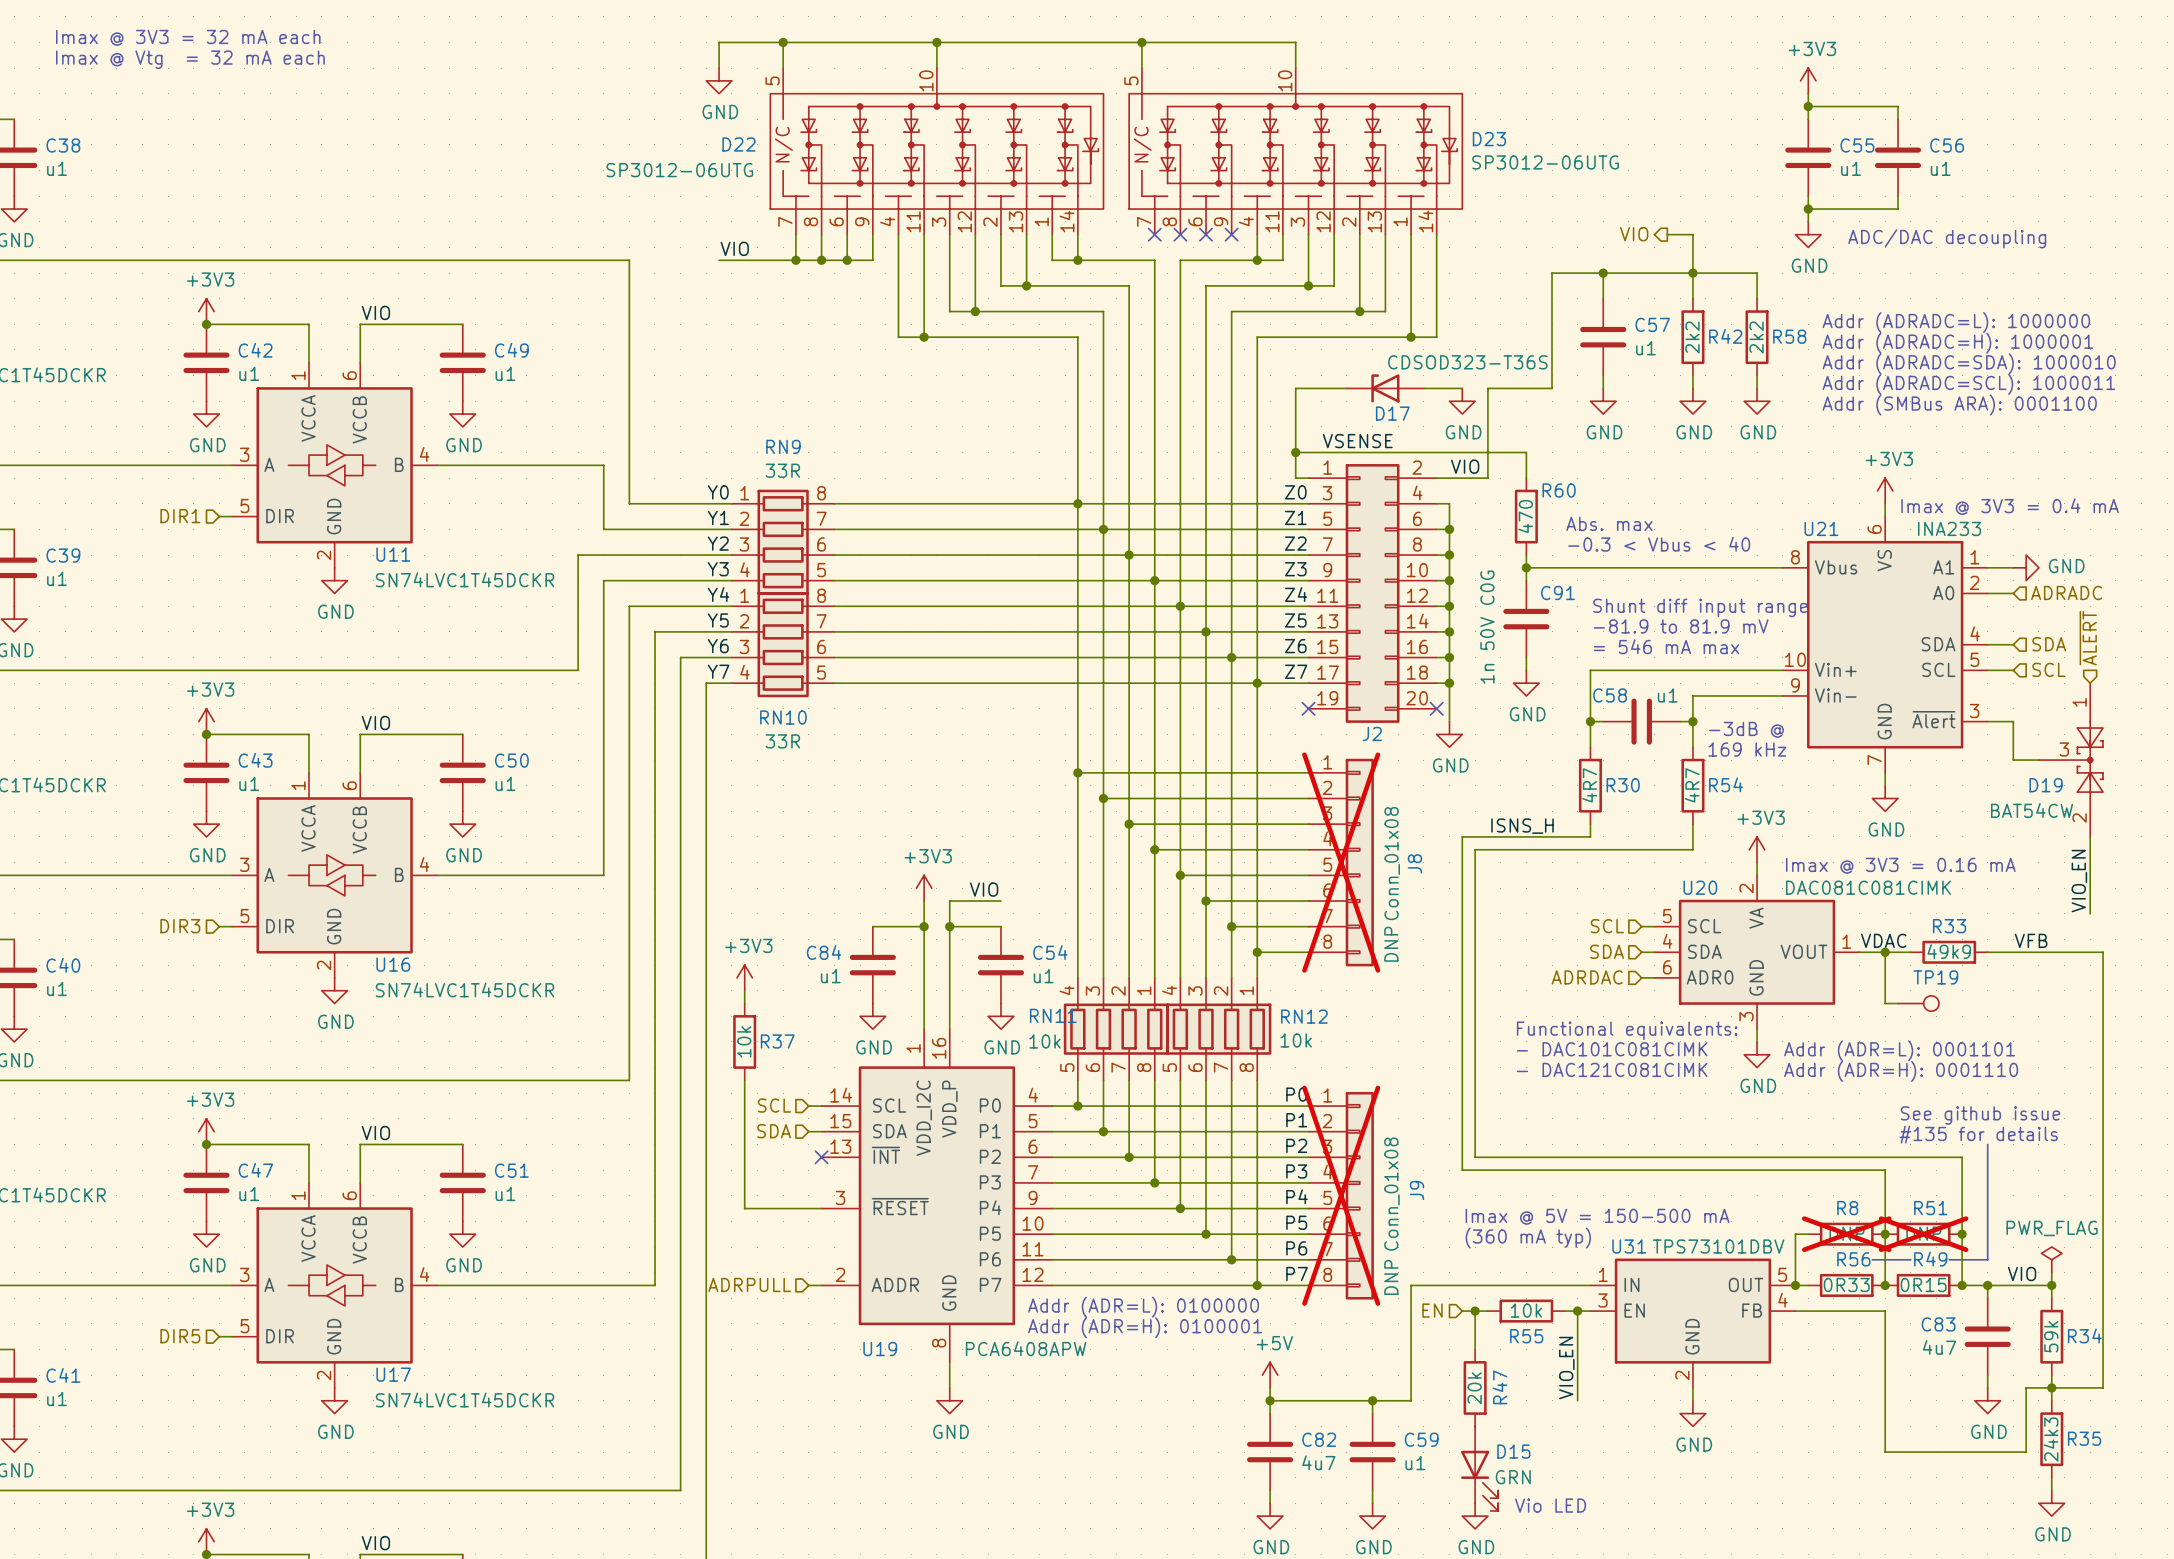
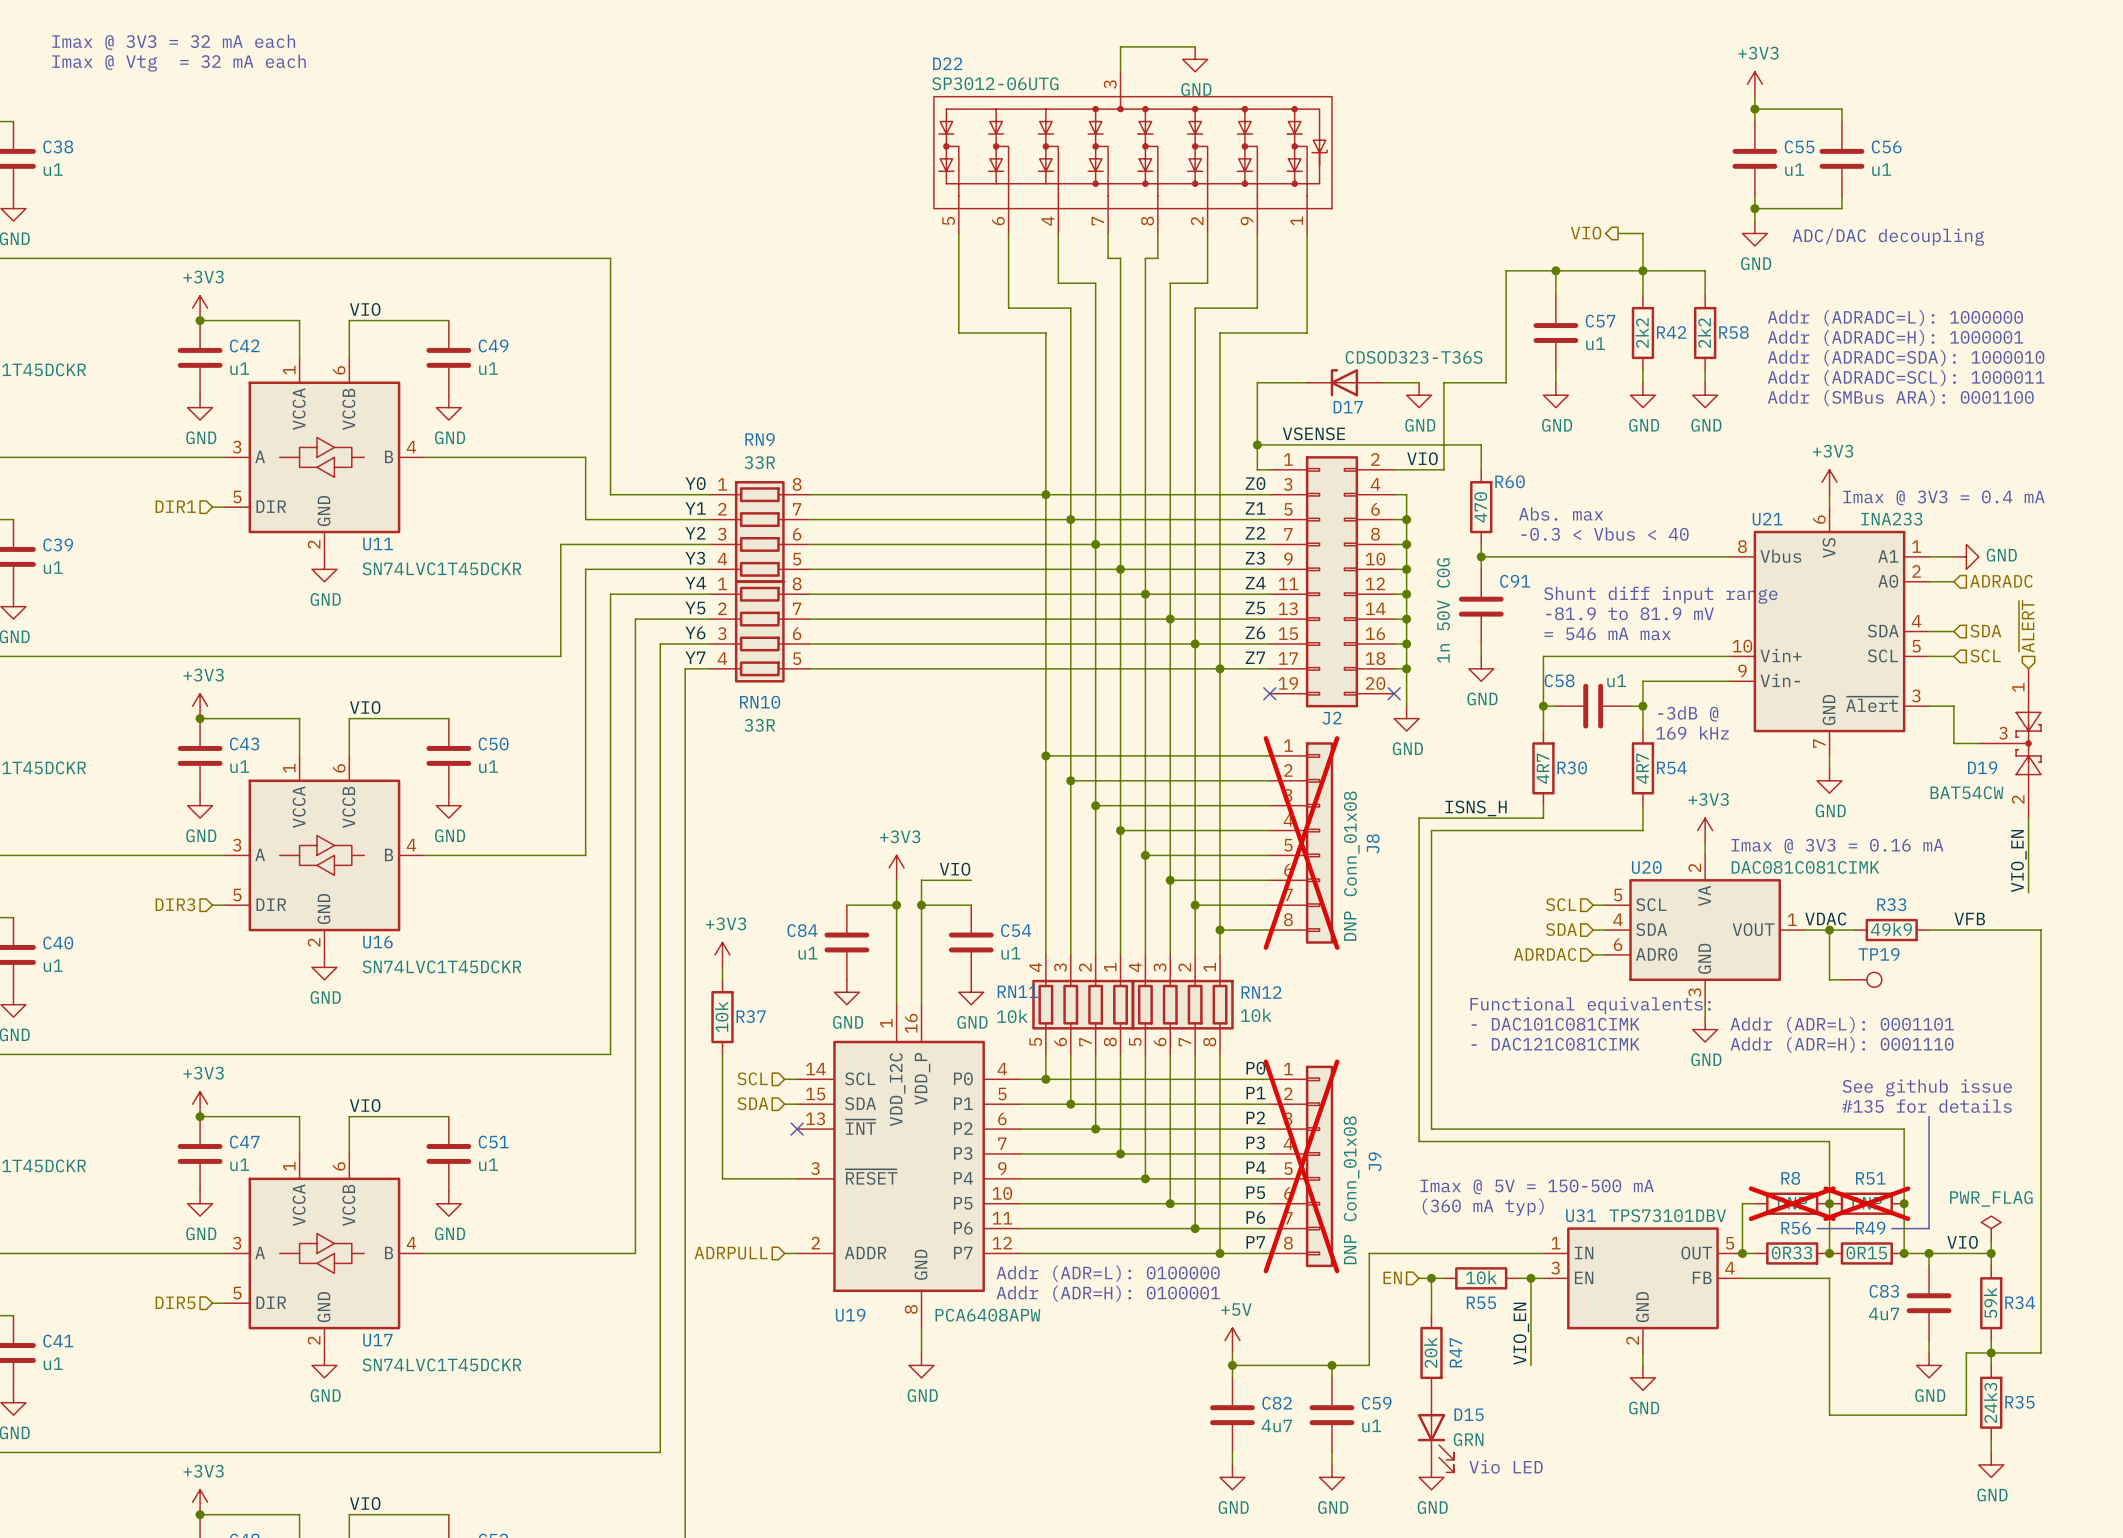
wire: (783, 42) (783, 68) -> none
junction: (783, 42) -> none
wire: (936, 42) (936, 68) -> none
junction: (936, 42) -> none
wire: (1141, 42) (1141, 68) -> none
junction: (1141, 42) -> none
wire: (1154, 42) (719, 42) (719, 68) -> (1120, 46) (1120, 71)
wire: (1231, 42) (1295, 42) (1295, 68) -> none
power symbol: none -> GND (1195, 59)
D22 symbol: [770, 68, 1104, 235] -> [933, 71, 1332, 234]
power symbol: GND (719, 80) -> none
D22 name position: D22 (738, 144) -> D22 (947, 63)
D23: SP3012-06UTG (1295, 151) -> none
D22 value position: SP3012-06UTG (679, 170) -> SP3012-06UTG (995, 83)
wire: (795, 234) (795, 260) -> none
wire: (821, 234) (821, 260) -> none
wire: (847, 234) (847, 260) -> none
wire: (872, 234) (872, 260) (719, 260) -> none
wire: (898, 234) (898, 337) (988, 337) -> (958, 233) (958, 333)
wire: (924, 234) (924, 337) -> none
wire: (949, 234) (949, 311) (1039, 311) -> (1008, 233) (1008, 308)
wire: (975, 234) (975, 311) -> none
wire: (1000, 234) (1000, 285) (1090, 285) -> (1058, 233) (1058, 283)
wire: (1026, 234) (1026, 285) -> none
wire: (1052, 234) (1052, 260) (1141, 260) -> (1108, 233) (1108, 258)
wire: (1077, 234) (1077, 260) -> none
no-connect mark: (1154, 234) -> none
no-connect mark: (1180, 234) -> none
no-connect mark: (1206, 234) -> none
no-connect mark: (1231, 234) -> none
wire: (1257, 234) (1257, 260) -> none
wire: (1282, 234) (1282, 260) (1193, 260) -> (1157, 233) (1157, 258)
wire: (1308, 234) (1308, 285) -> none
wire: (1334, 234) (1334, 285) (1244, 285) -> (1207, 233) (1207, 283)
wire: (1359, 234) (1359, 311) -> none
wire: (1385, 234) (1385, 311) (1295, 311) -> (1257, 233) (1257, 308)
wire: (1411, 234) (1411, 337) -> none
wire: (1436, 234) (1436, 337) (1346, 337) -> (1307, 233) (1307, 333)
label: VIO (734, 248) -> none
junction: (795, 260) -> none
junction: (821, 260) -> none
junction: (847, 260) -> none
junction: (1077, 260) -> none
junction: (1257, 260) -> none
junction: (1026, 285) -> none
junction: (1308, 285) -> none
junction: (975, 311) -> none
junction: (1359, 311) -> none
junction: (924, 337) -> none
junction: (1411, 337) -> none

